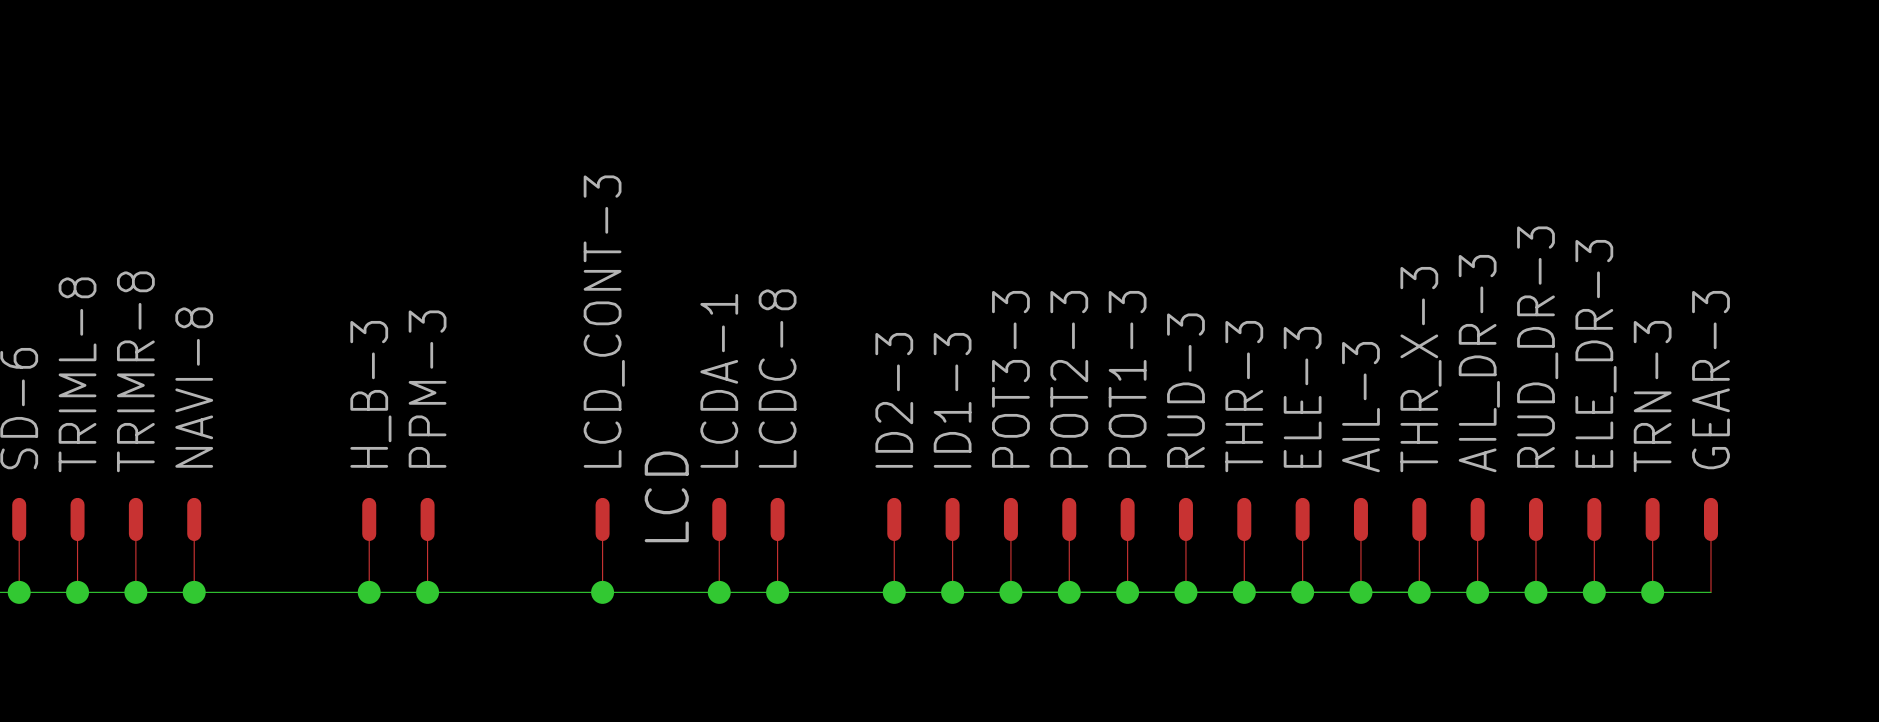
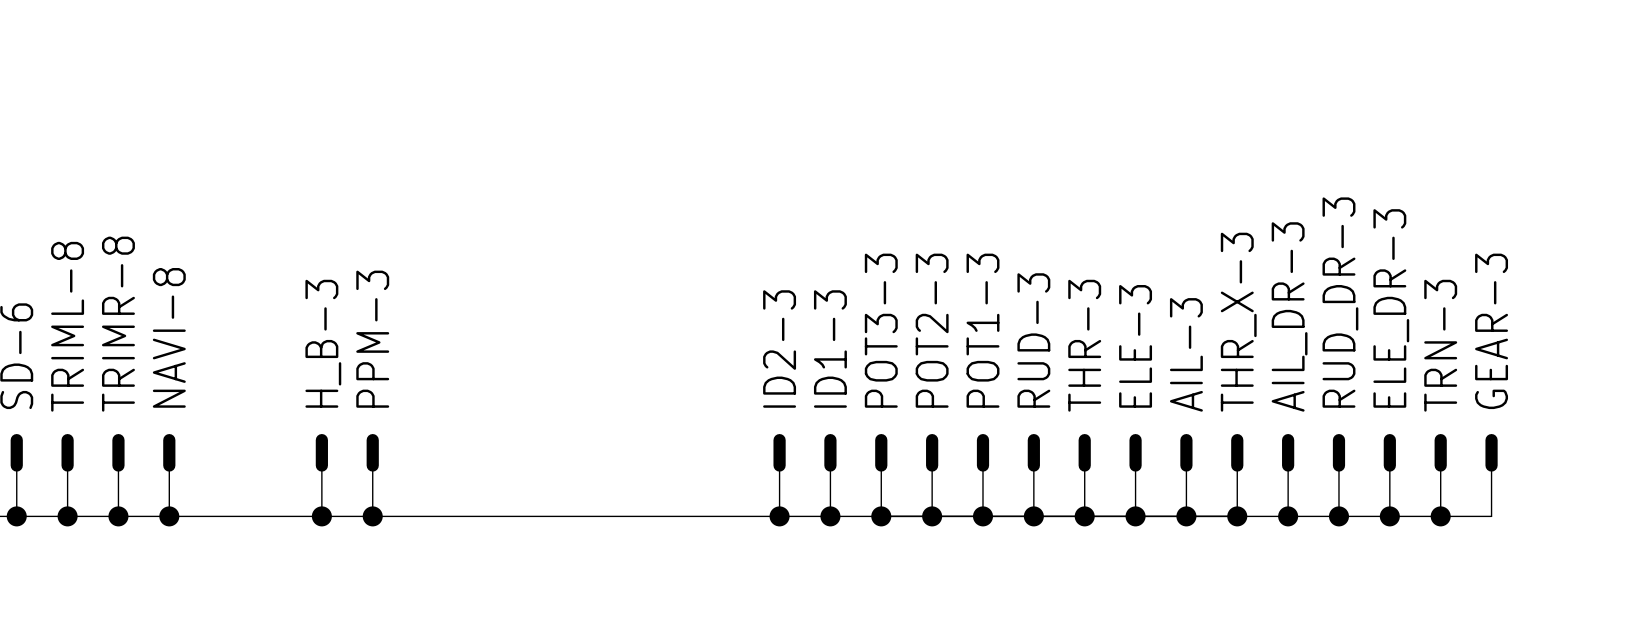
LCD_CONT-3: (602, 545) -> none
LCDA-1: LCD (719, 545) -> none
LCDC-8: (777, 545) -> none
junction: (602, 592) -> none
junction: (719, 592) -> none
junction: (777, 592) -> none

